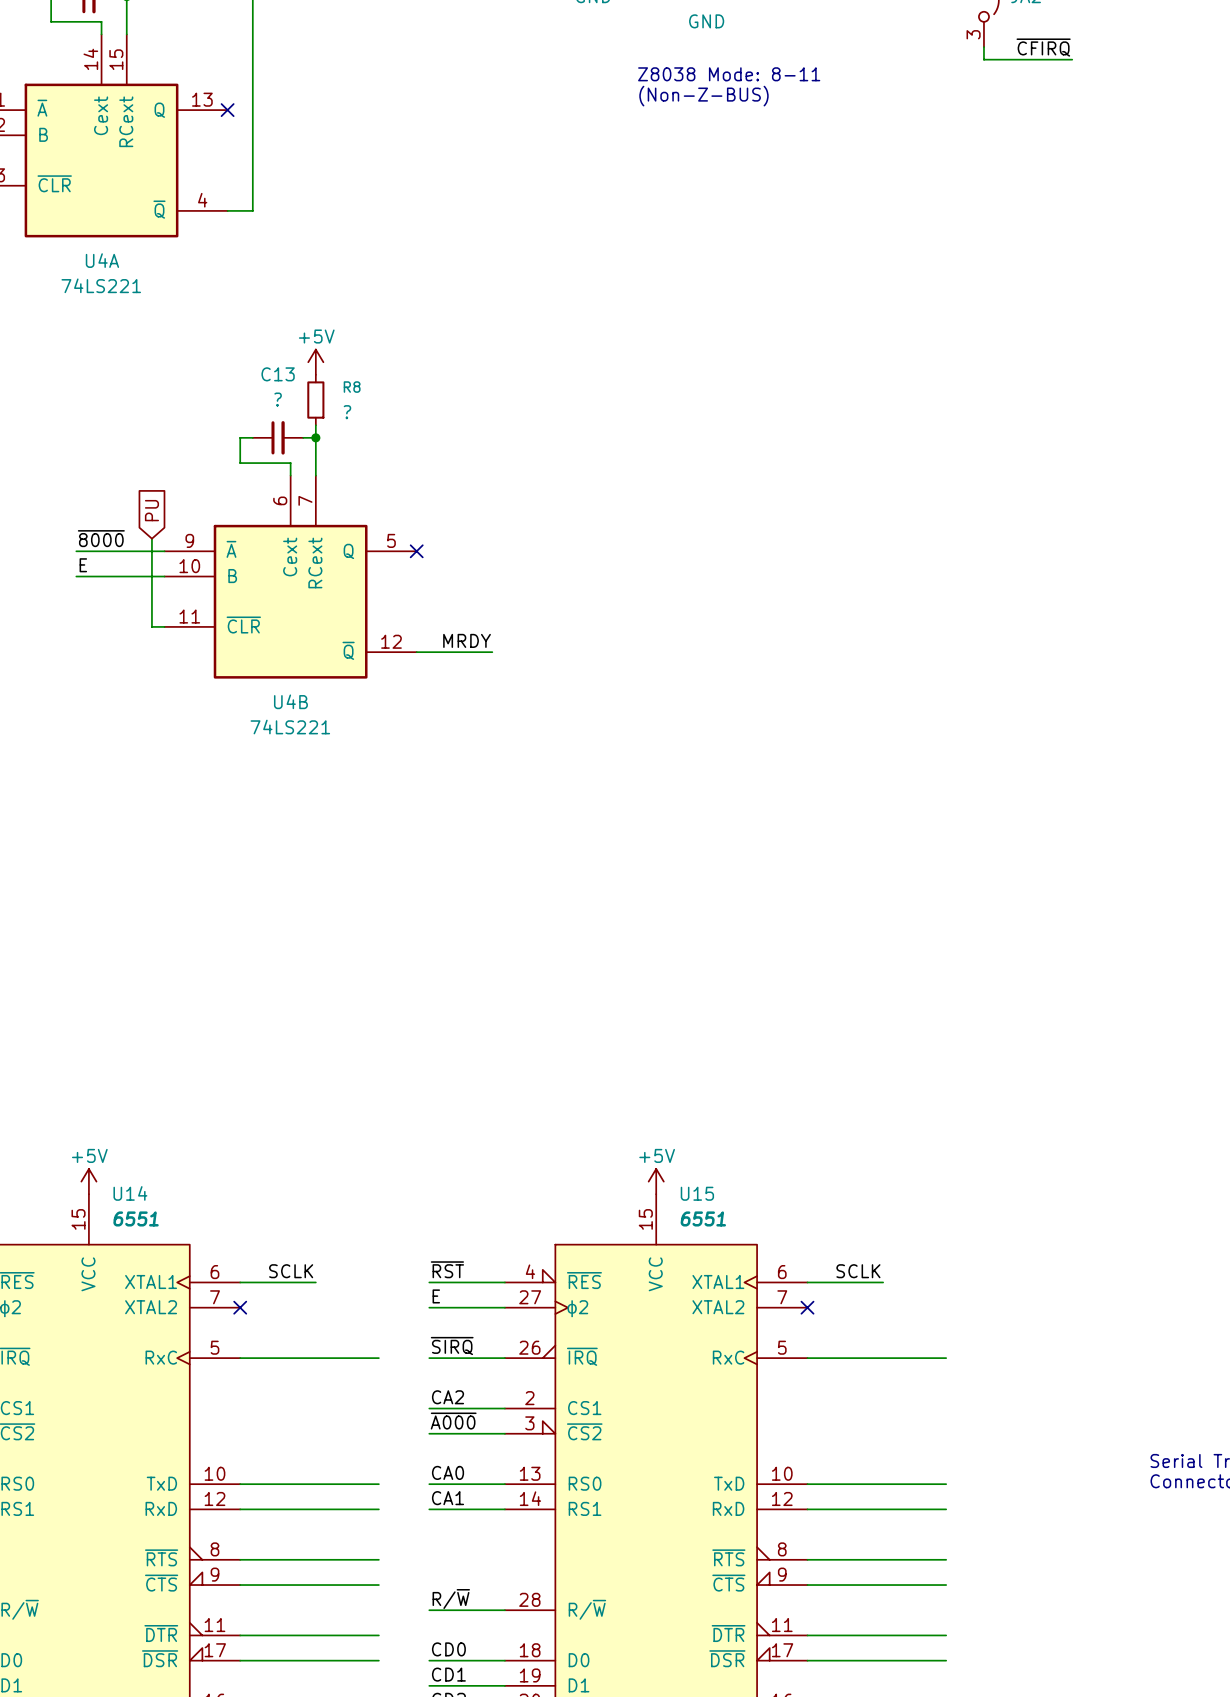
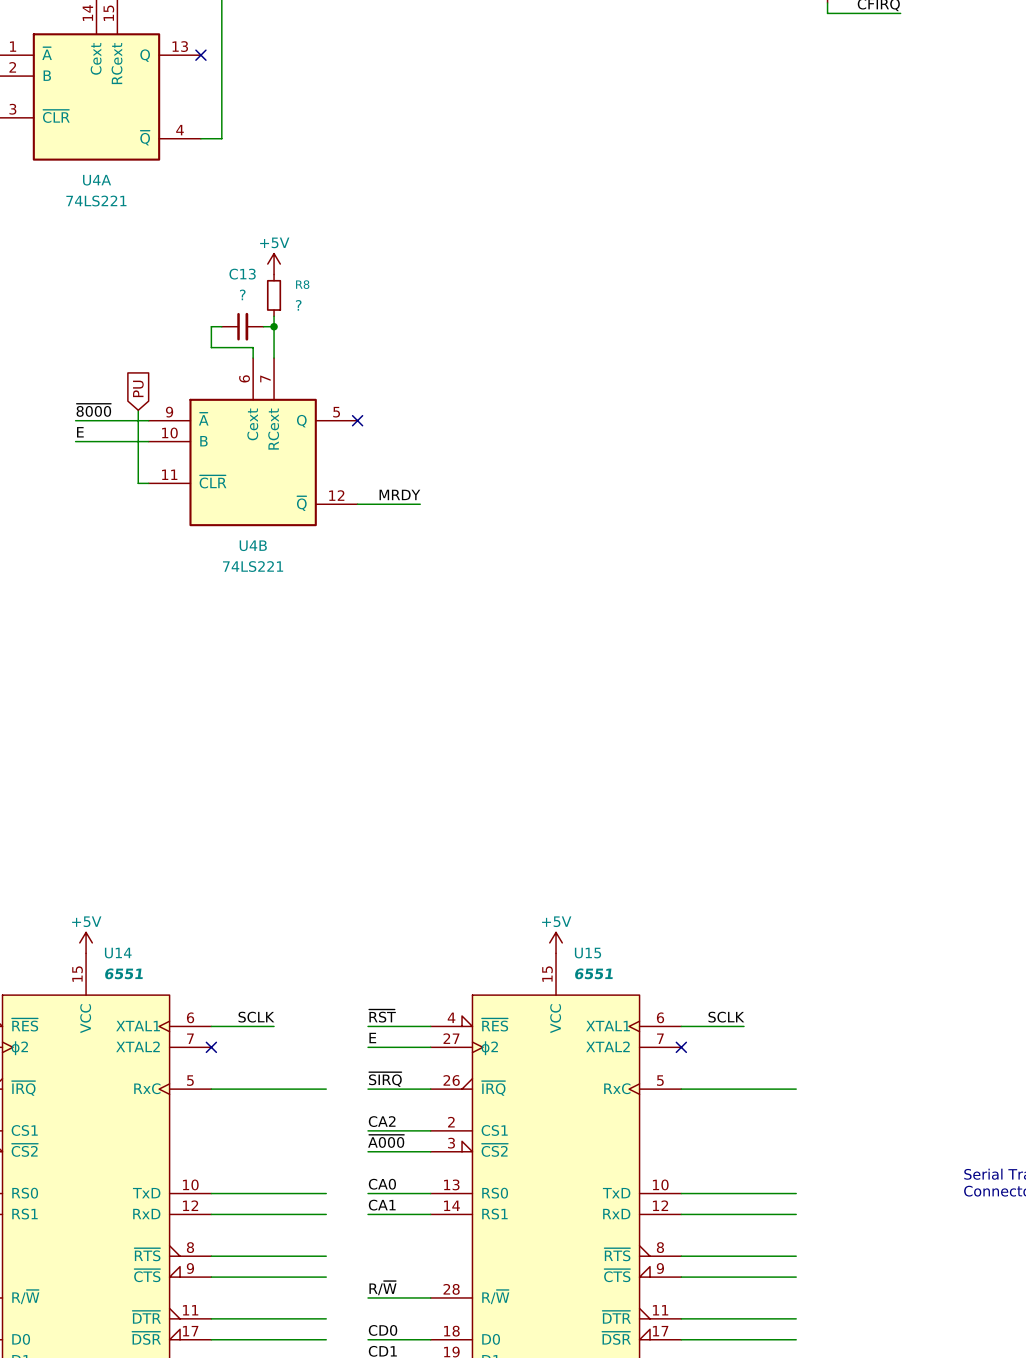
text: Z8038 Mode: 8-11 (729, 74) -> none
text: (Non-Z-BUS) (703, 96) -> none

